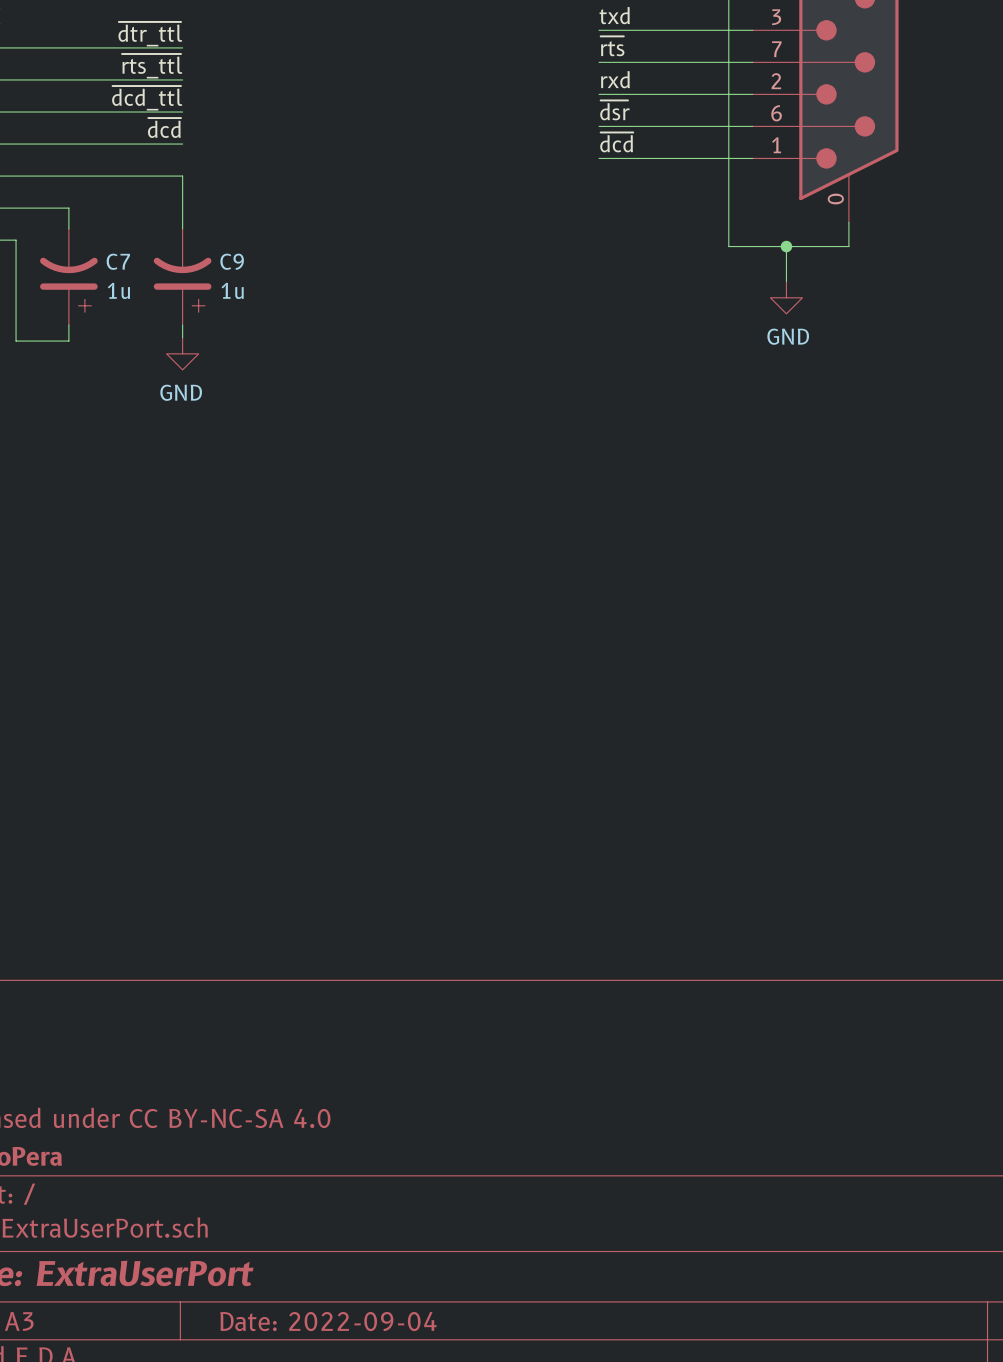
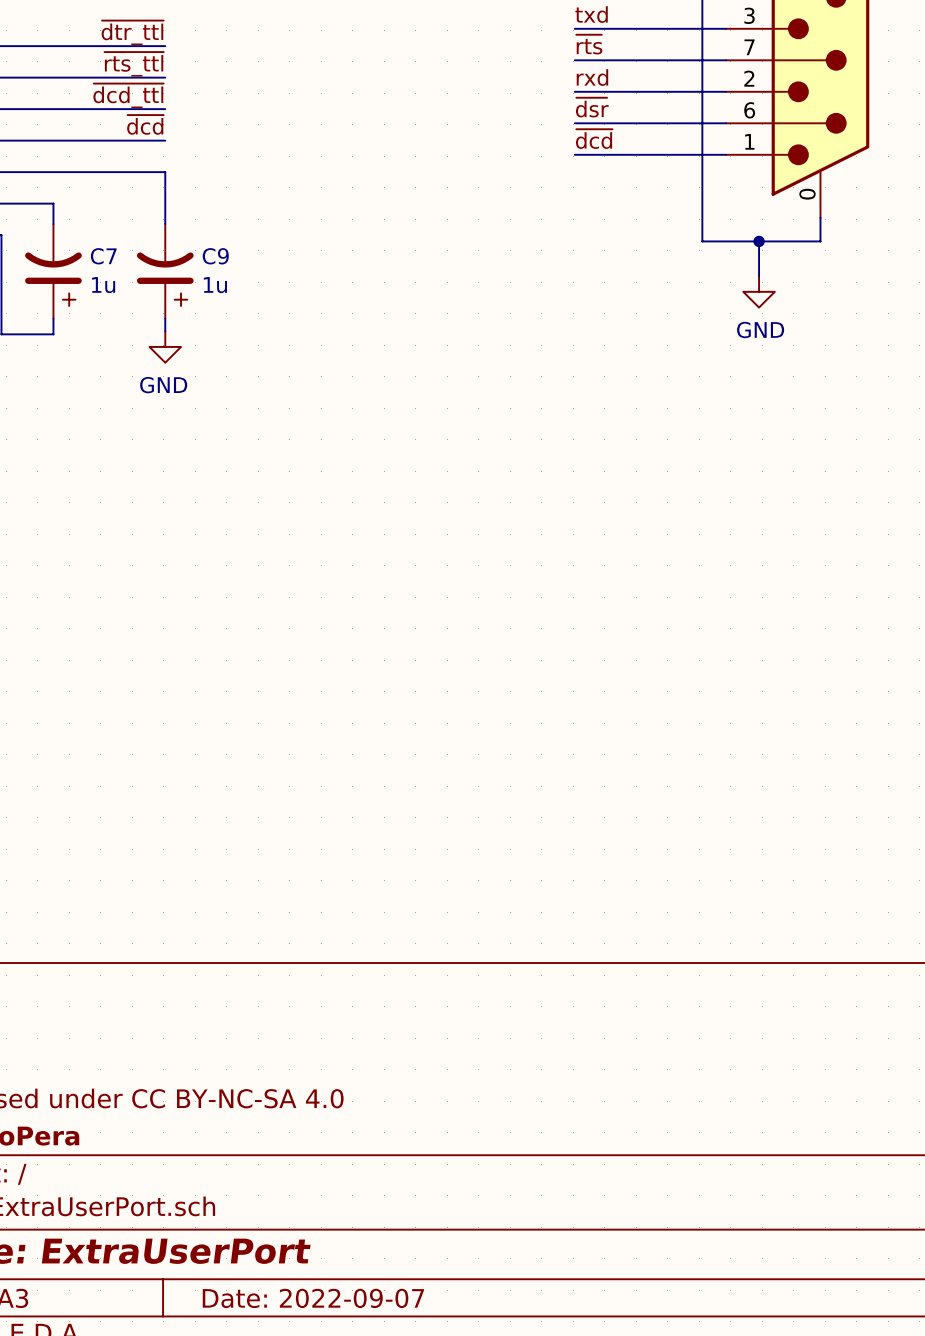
title block: Date: 2022-09-04 (328, 1321) -> Date: 2022-09-07 (313, 1298)

